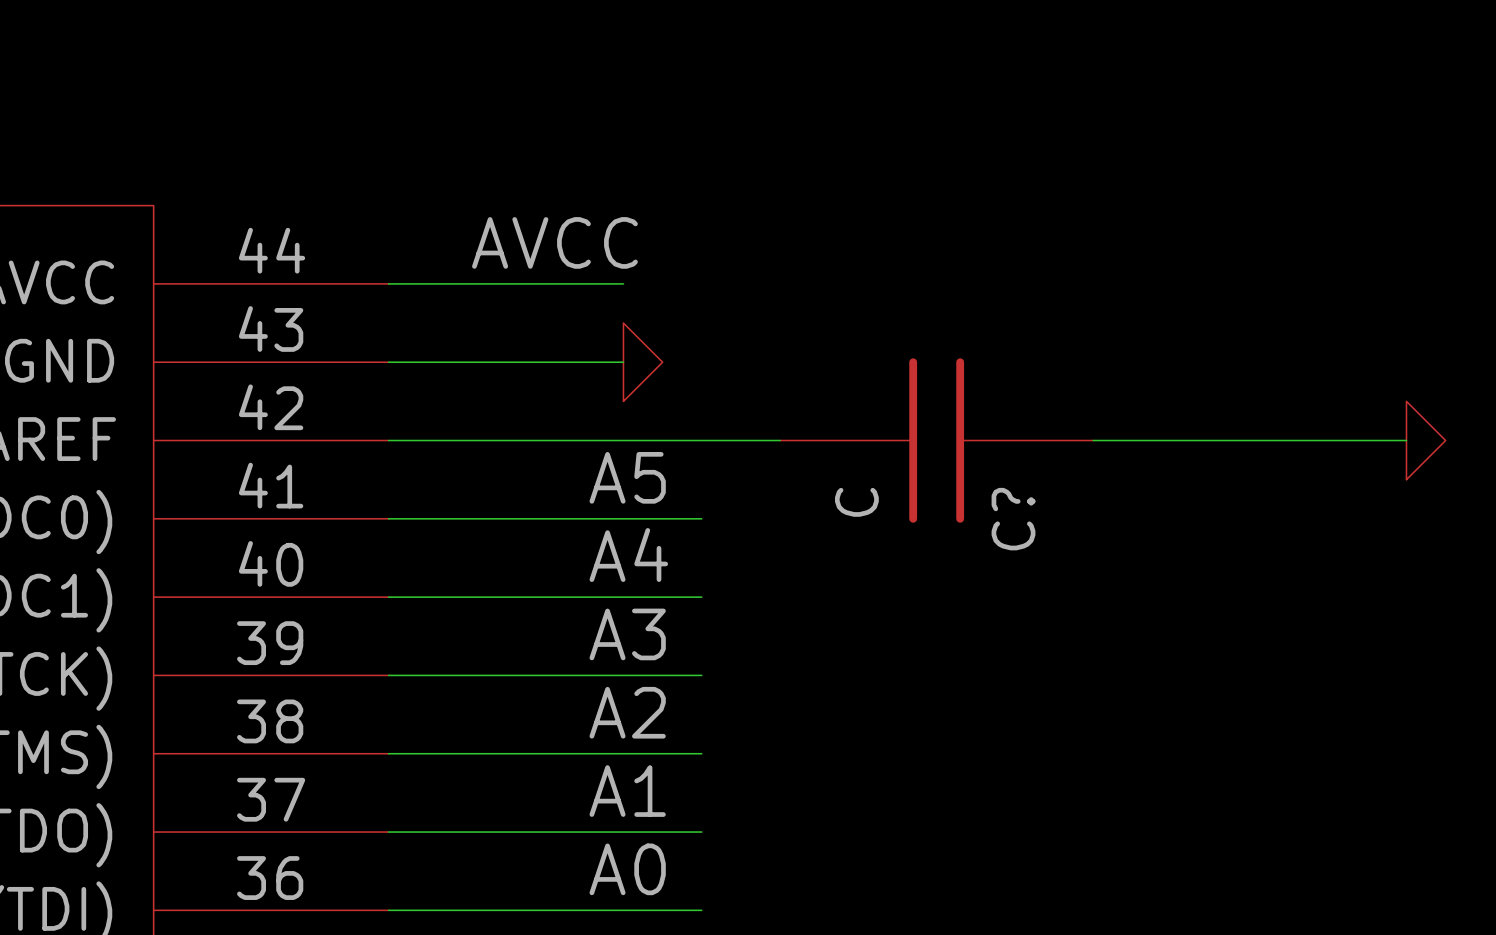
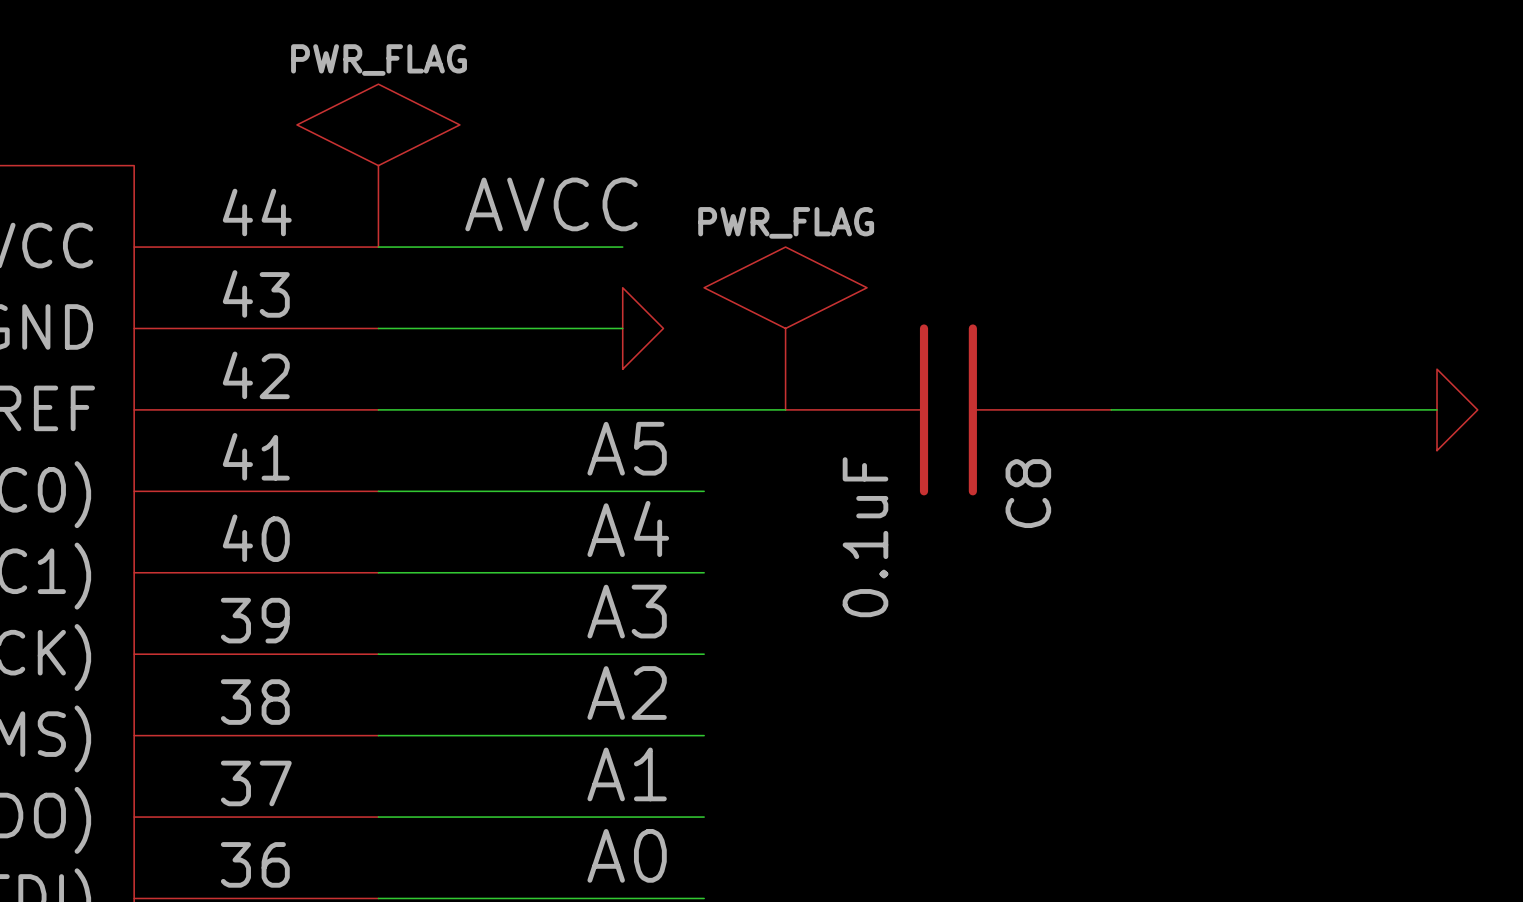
power symbol: none -> PWR_FLAG (378, 165)
power symbol: none -> PWR_FLAG (785, 328)
C? value: C (856, 502) -> 0.1uF (865, 537)
C? name: C? (1013, 519) -> C8 (1028, 493)

